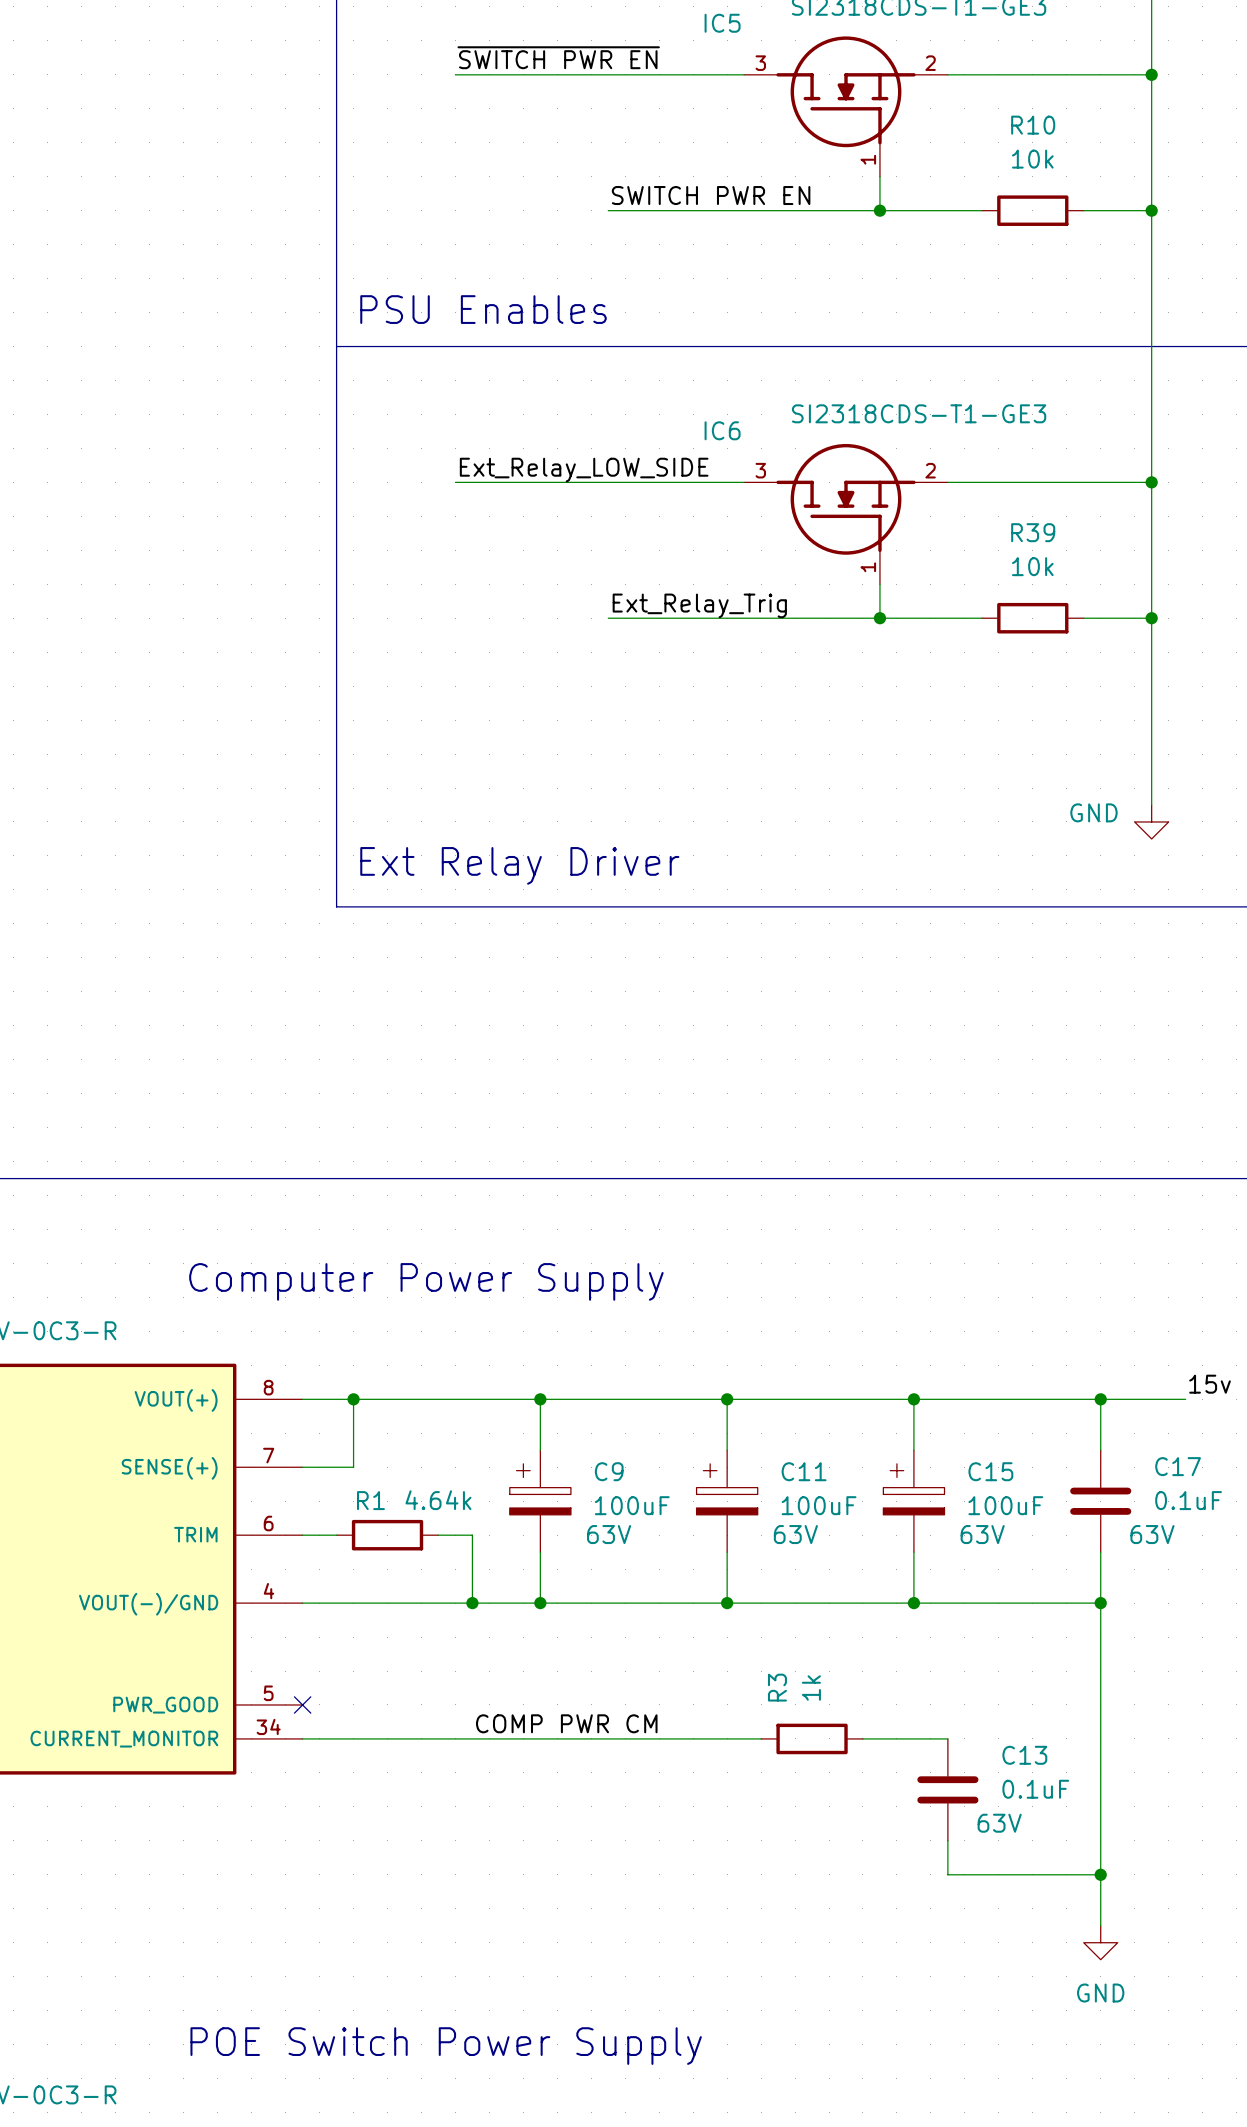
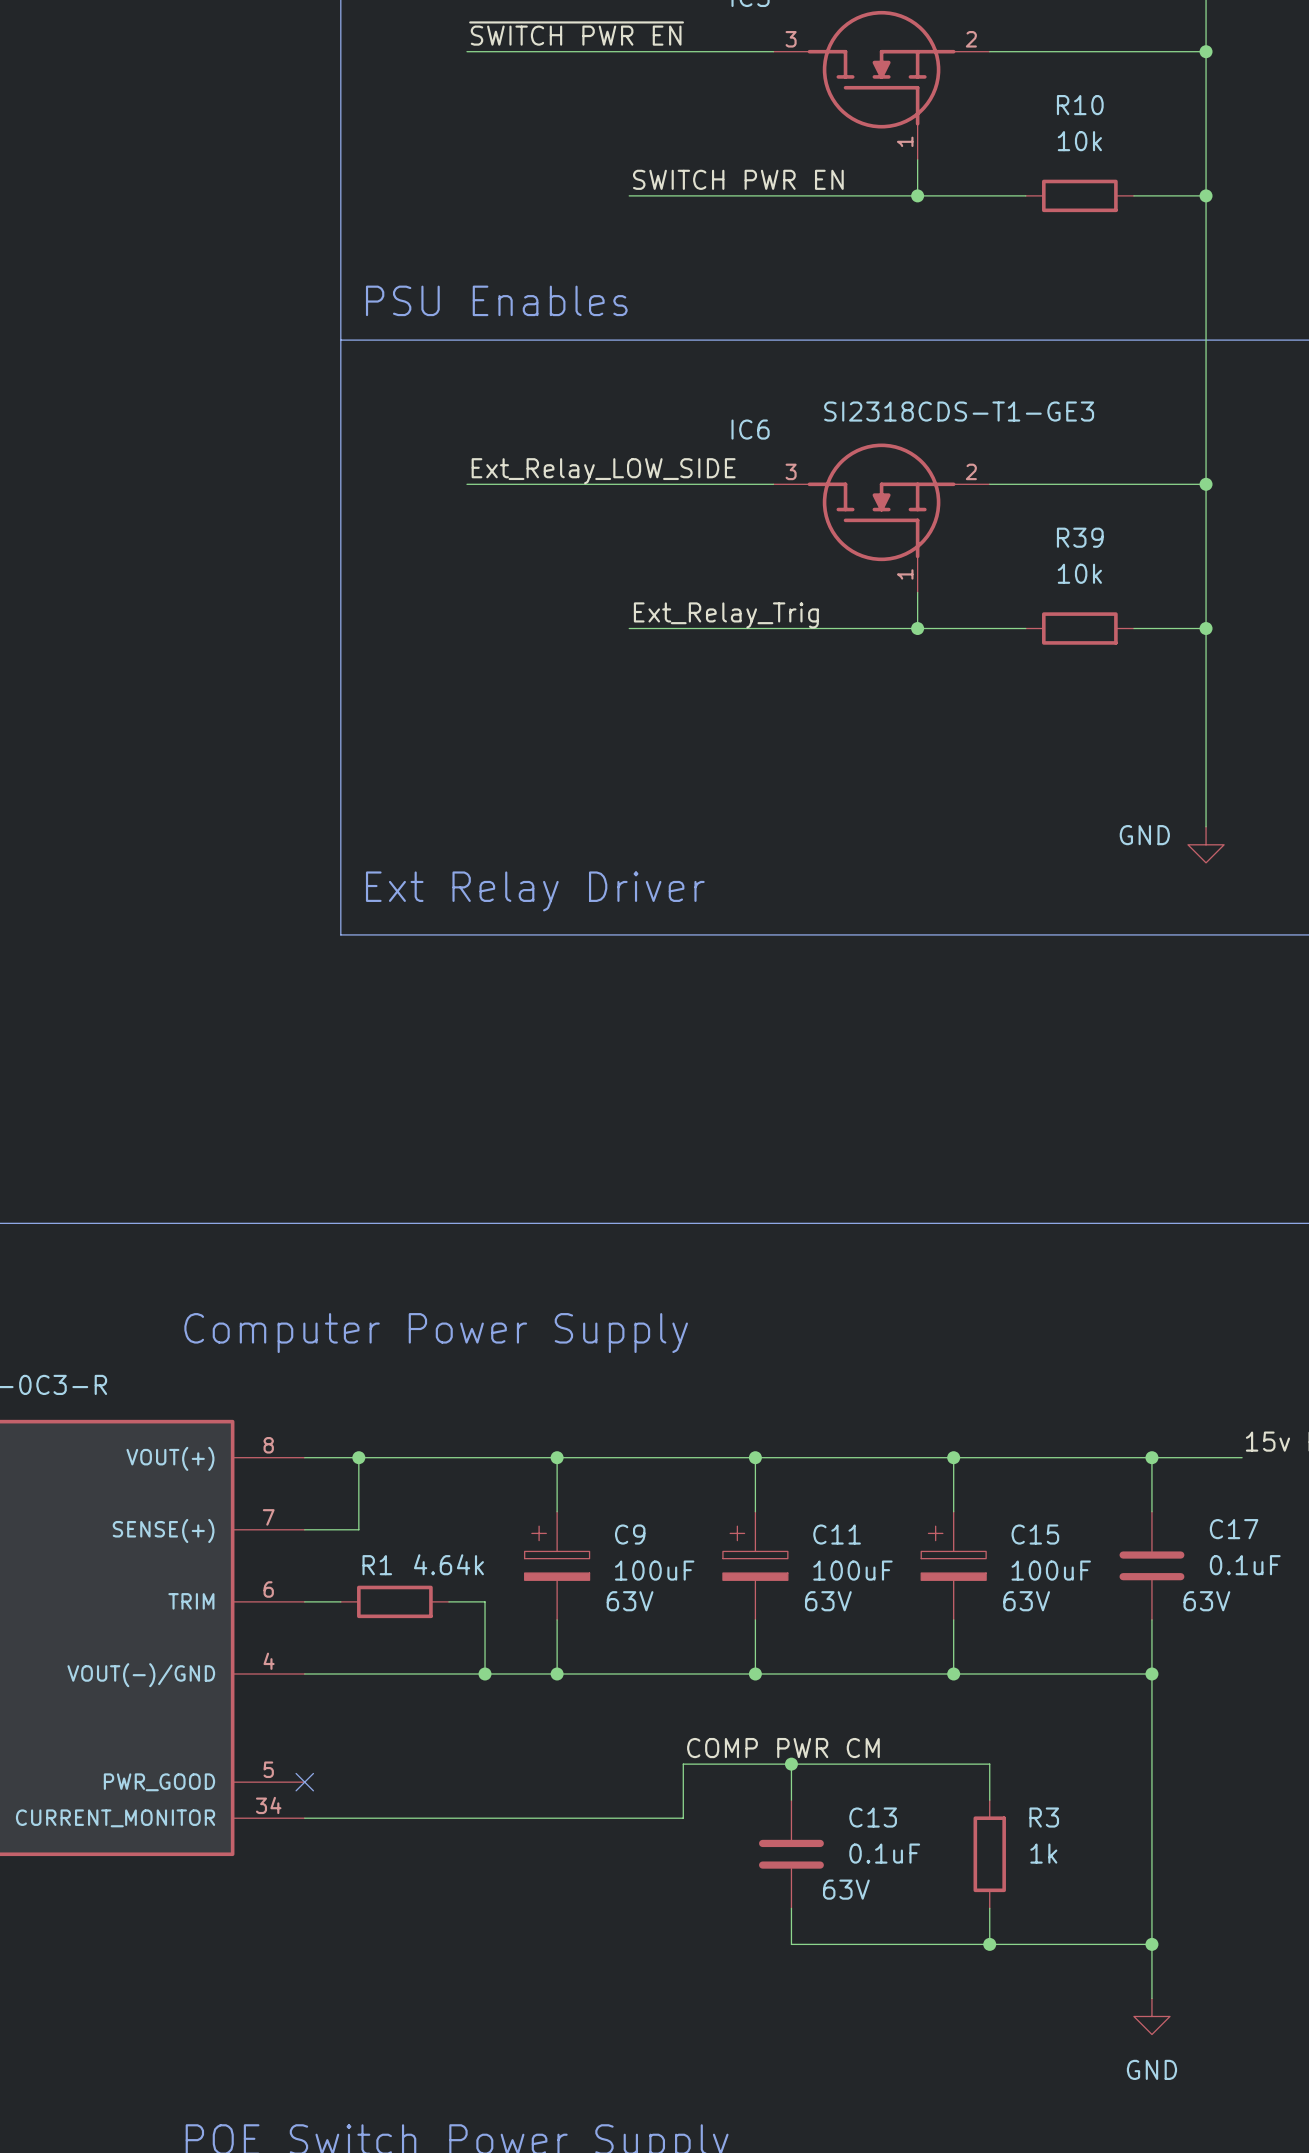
wire: none -> (791, 1764) (791, 1800)
junction: none -> (791, 1764)
label position: COMP PWR CM (566, 1723) -> COMP PWR CM (783, 1748)
wire: (659, 1738) (761, 1738) -> (683, 1818) (683, 1764) (989, 1764) (989, 1800)
R3 rotation: 0° (812, 1738) -> 90° clockwise (989, 1854)
R3 position: (812, 1738) -> (989, 1854)
wire: (862, 1738) (947, 1738) -> none
C13 position: (947, 1789) -> (791, 1854)
wire: none -> (791, 1908) (791, 1944) (1151, 1944)
wire: (947, 1857) (947, 1874) (1100, 1874) -> none
junction: none -> (989, 1944)
junction position: (1100, 1874) -> (1151, 1944)
power symbol position: GND (1100, 1942) -> GND (1151, 2016)

